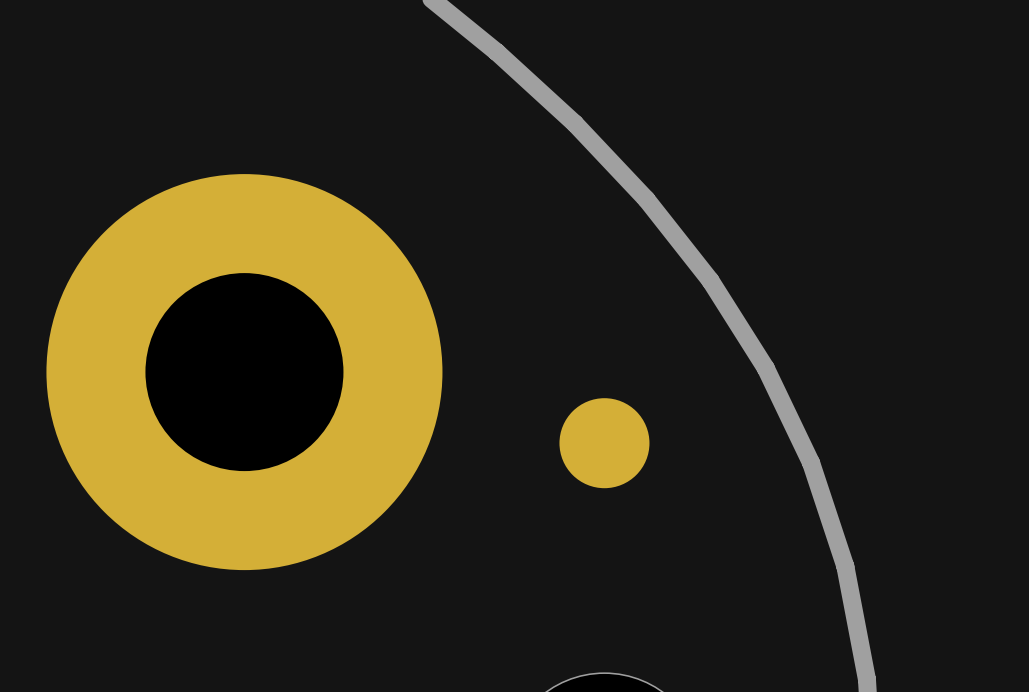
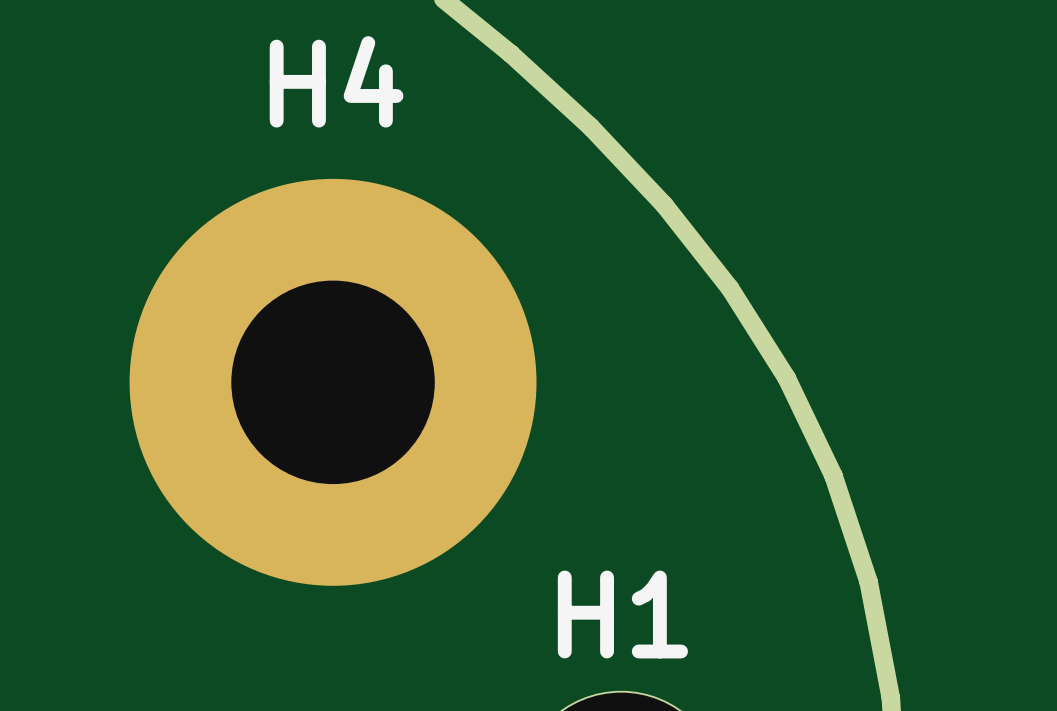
H4 name: none -> H4 (336, 81)
H4 position: (244, 372) -> (333, 382)
part: (604, 443) -> none
H1 name: none -> H1 (622, 614)

